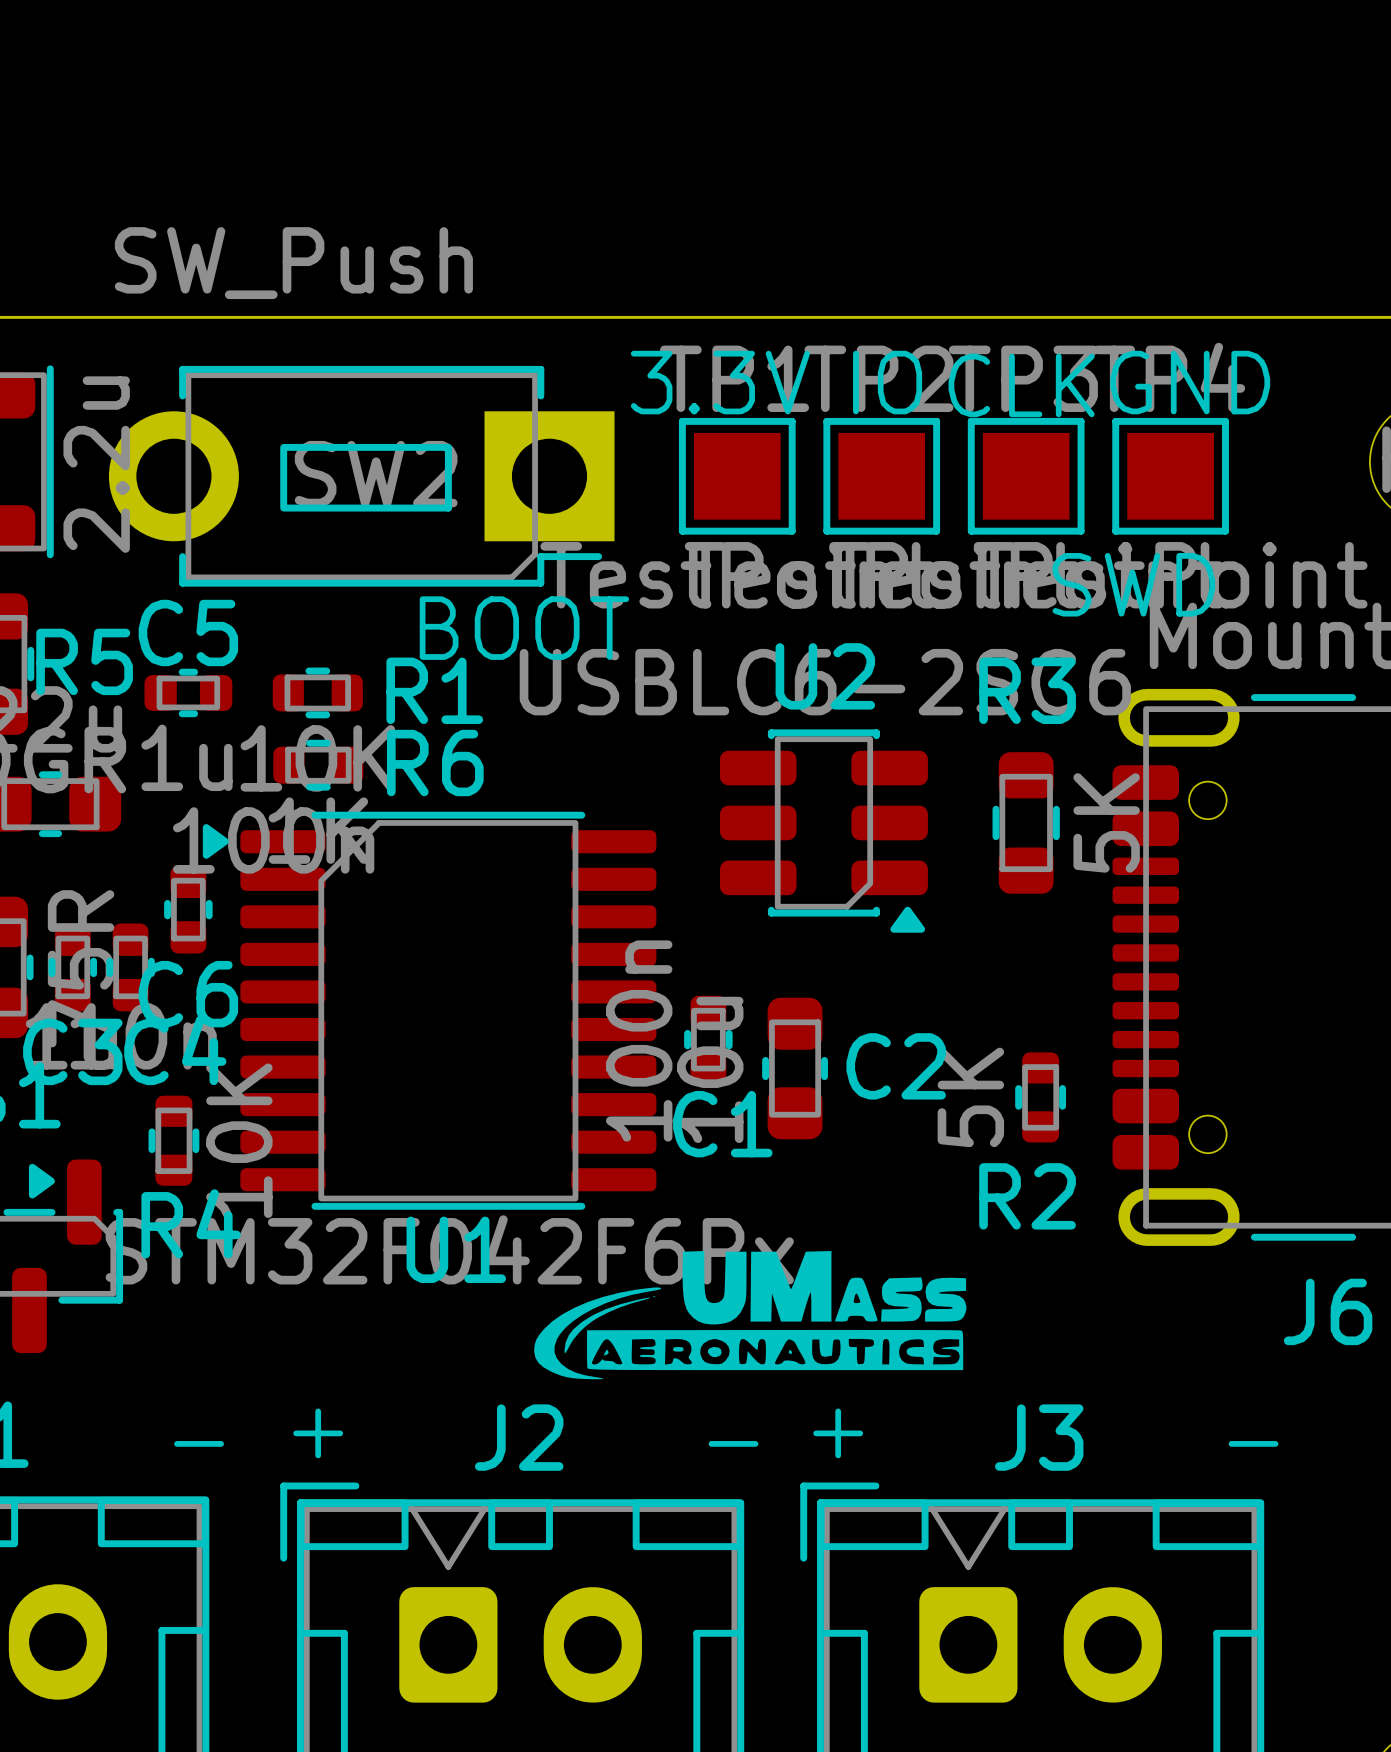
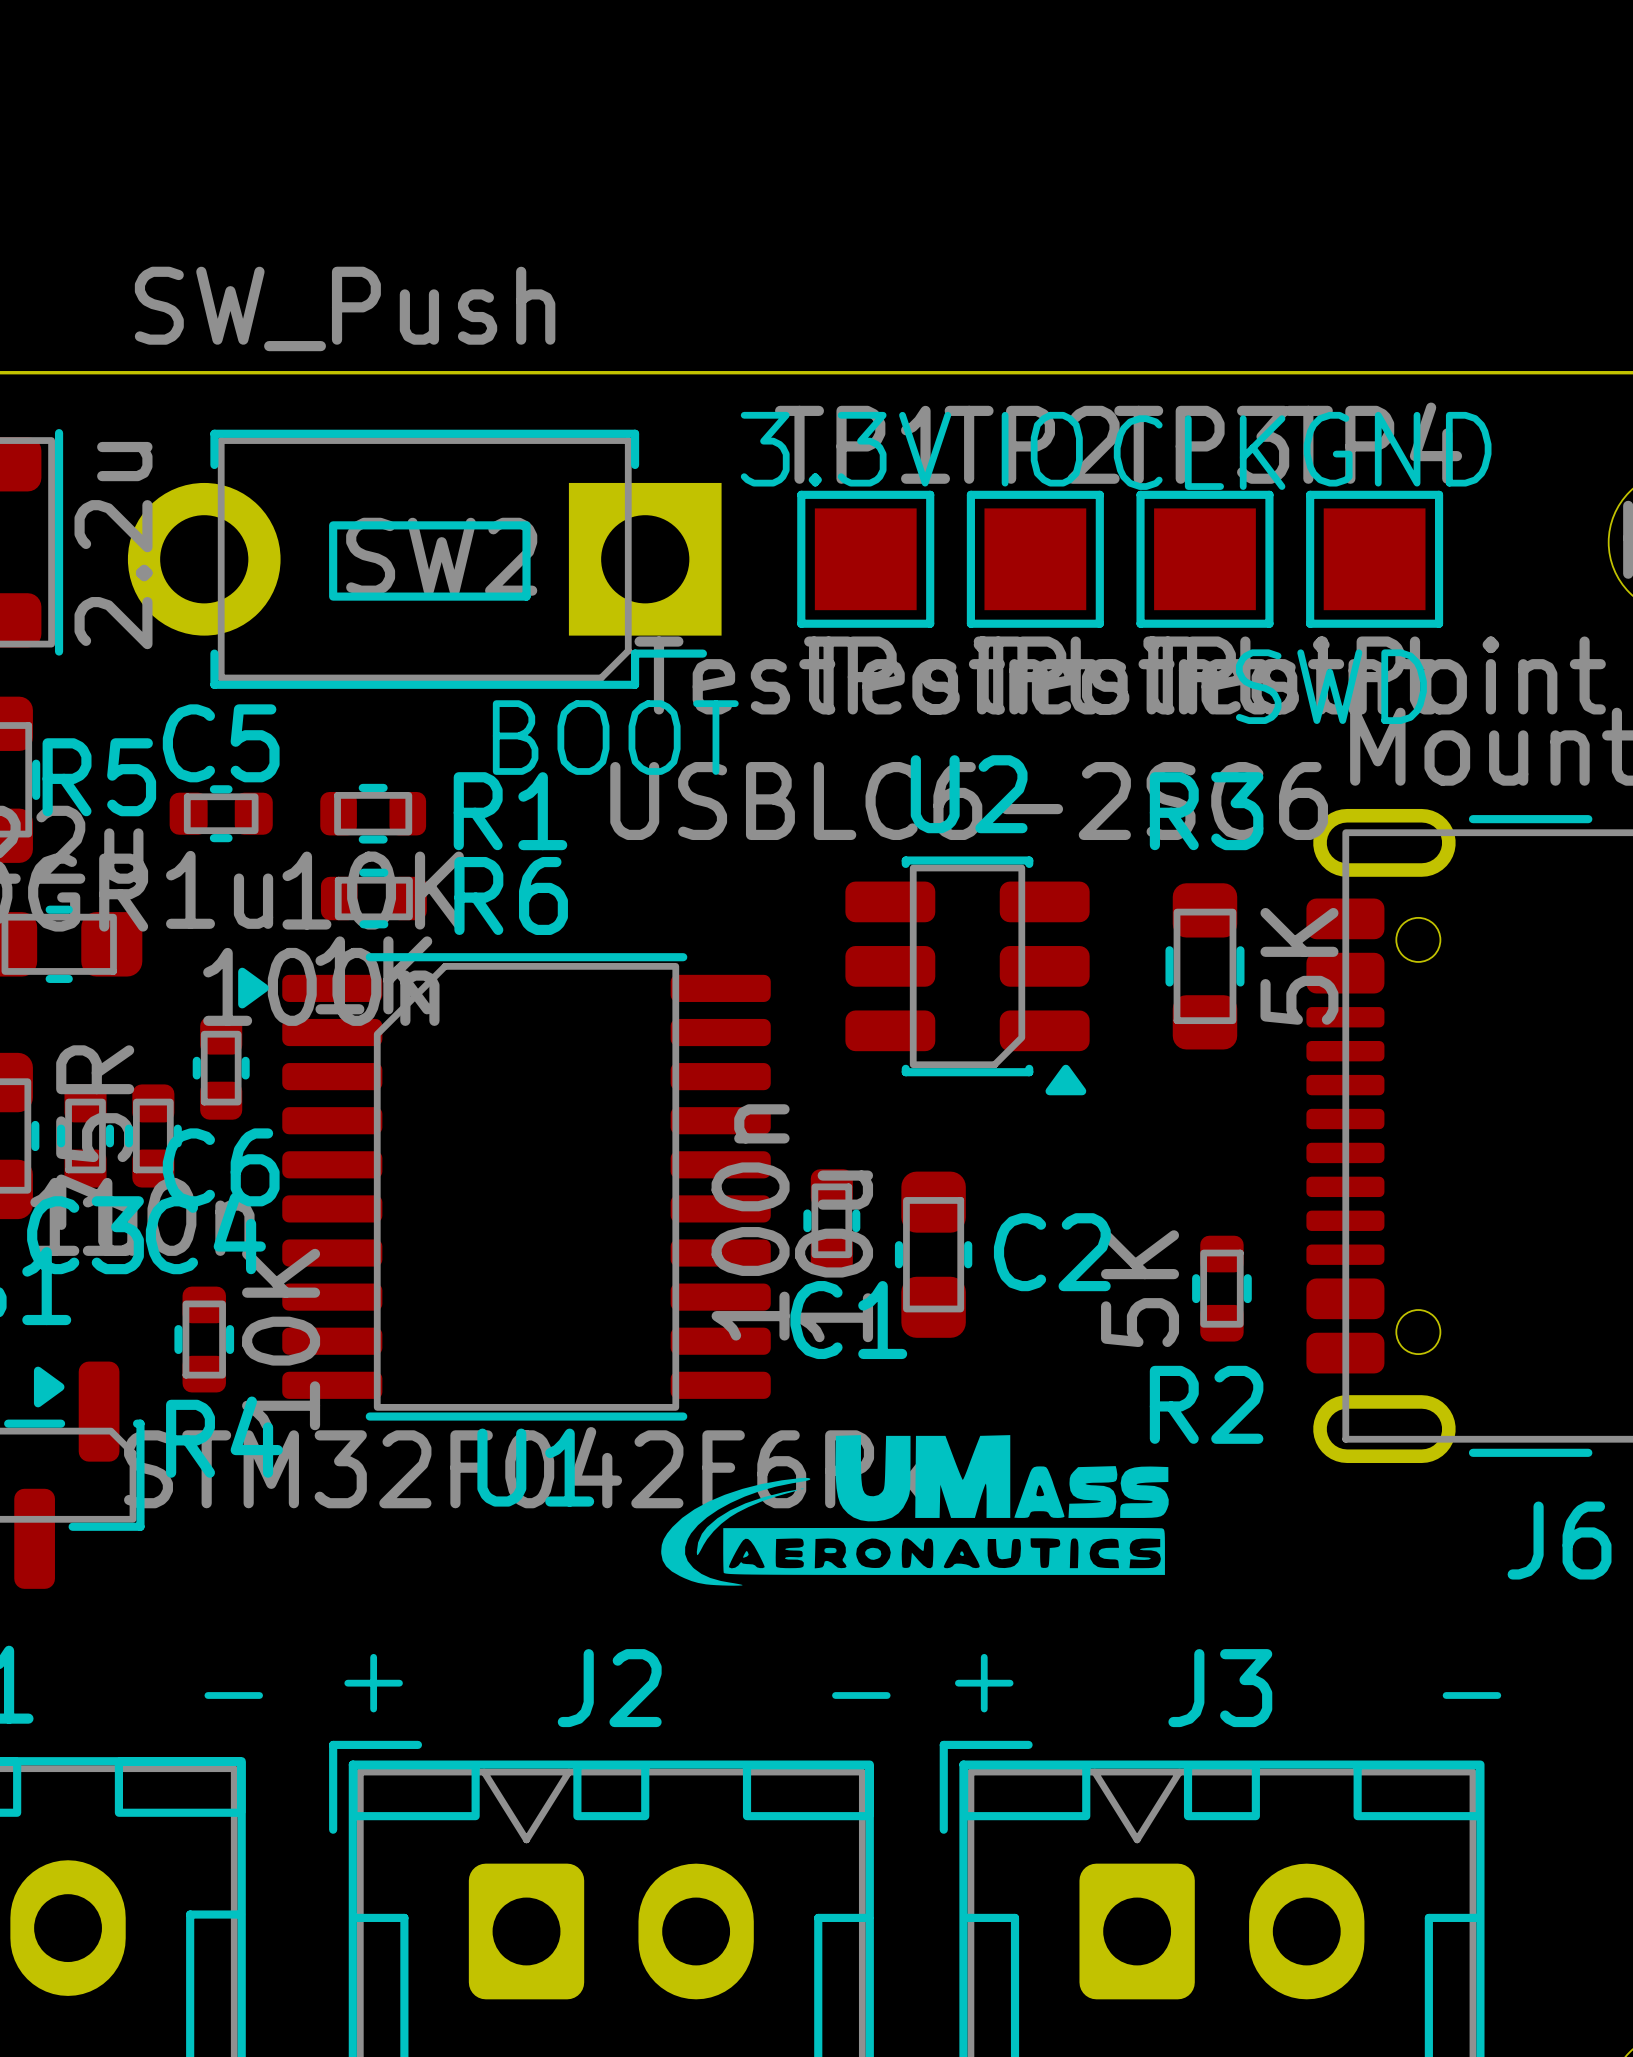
drawing position: (750, 1315) -> (914, 1510)

